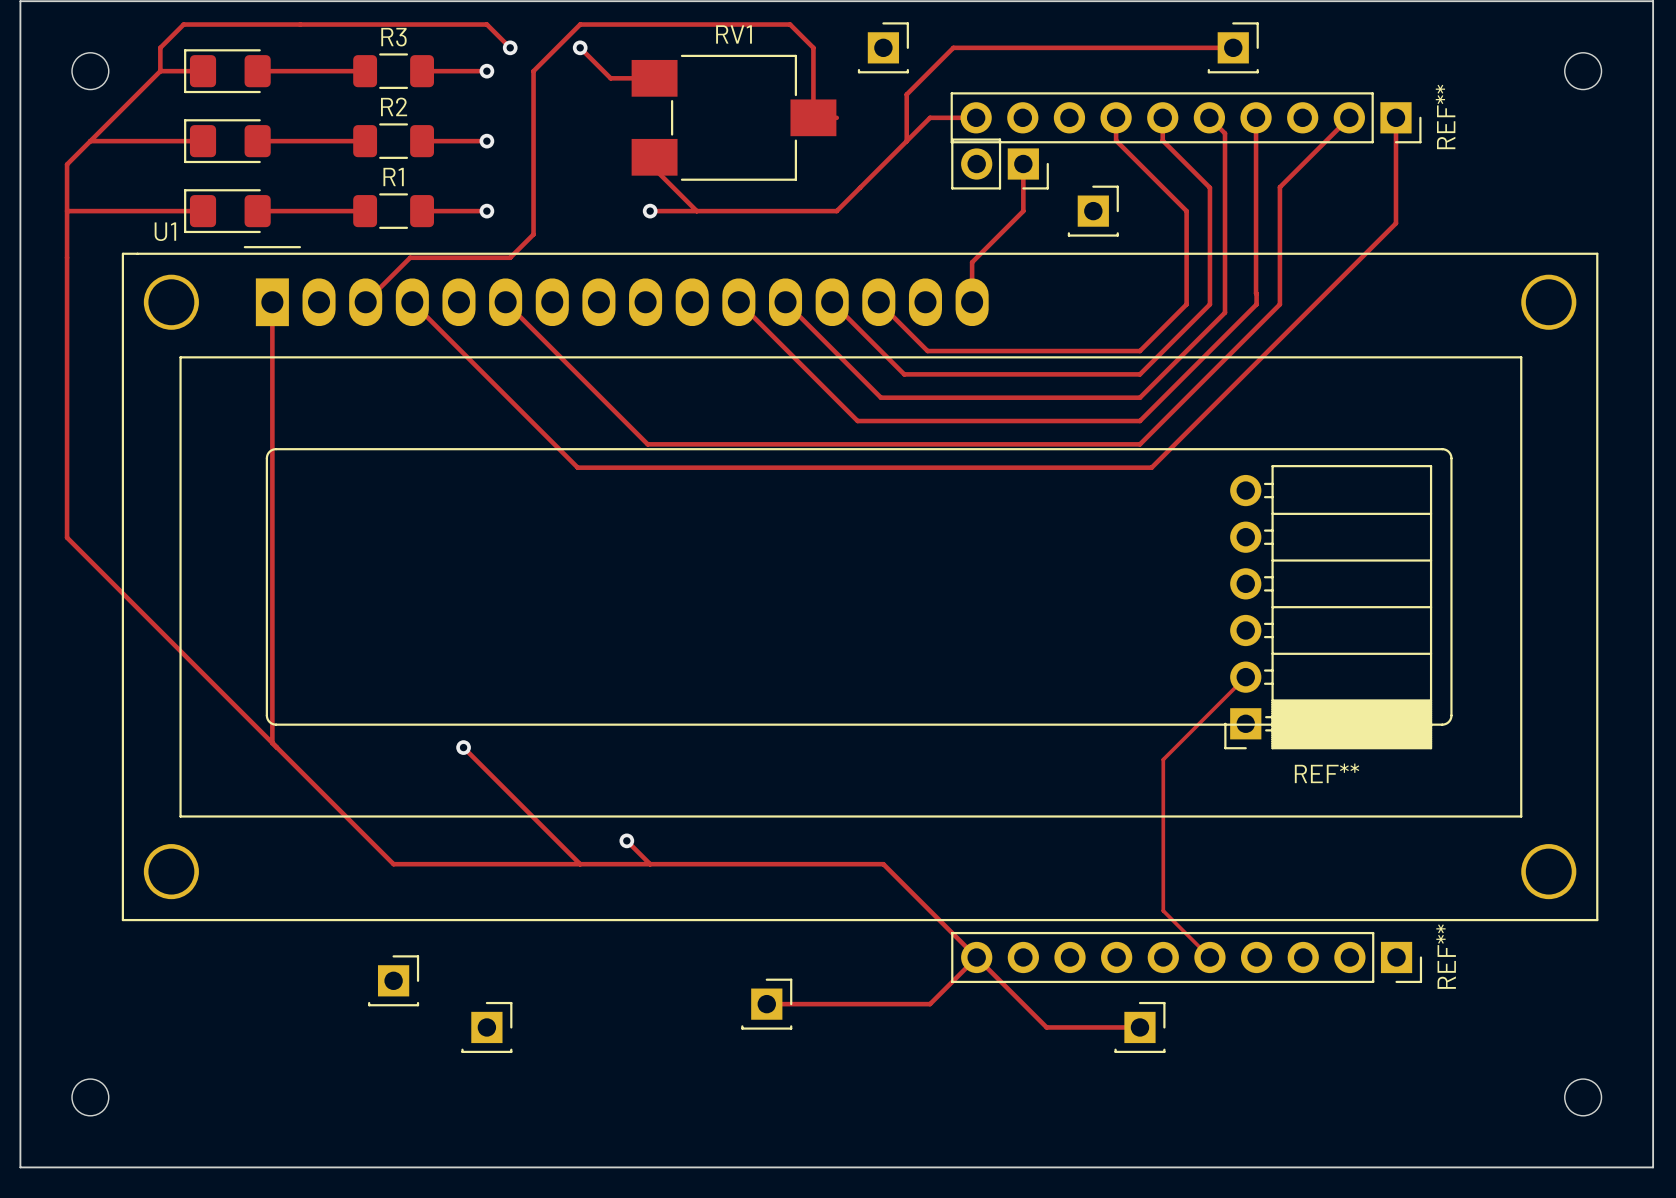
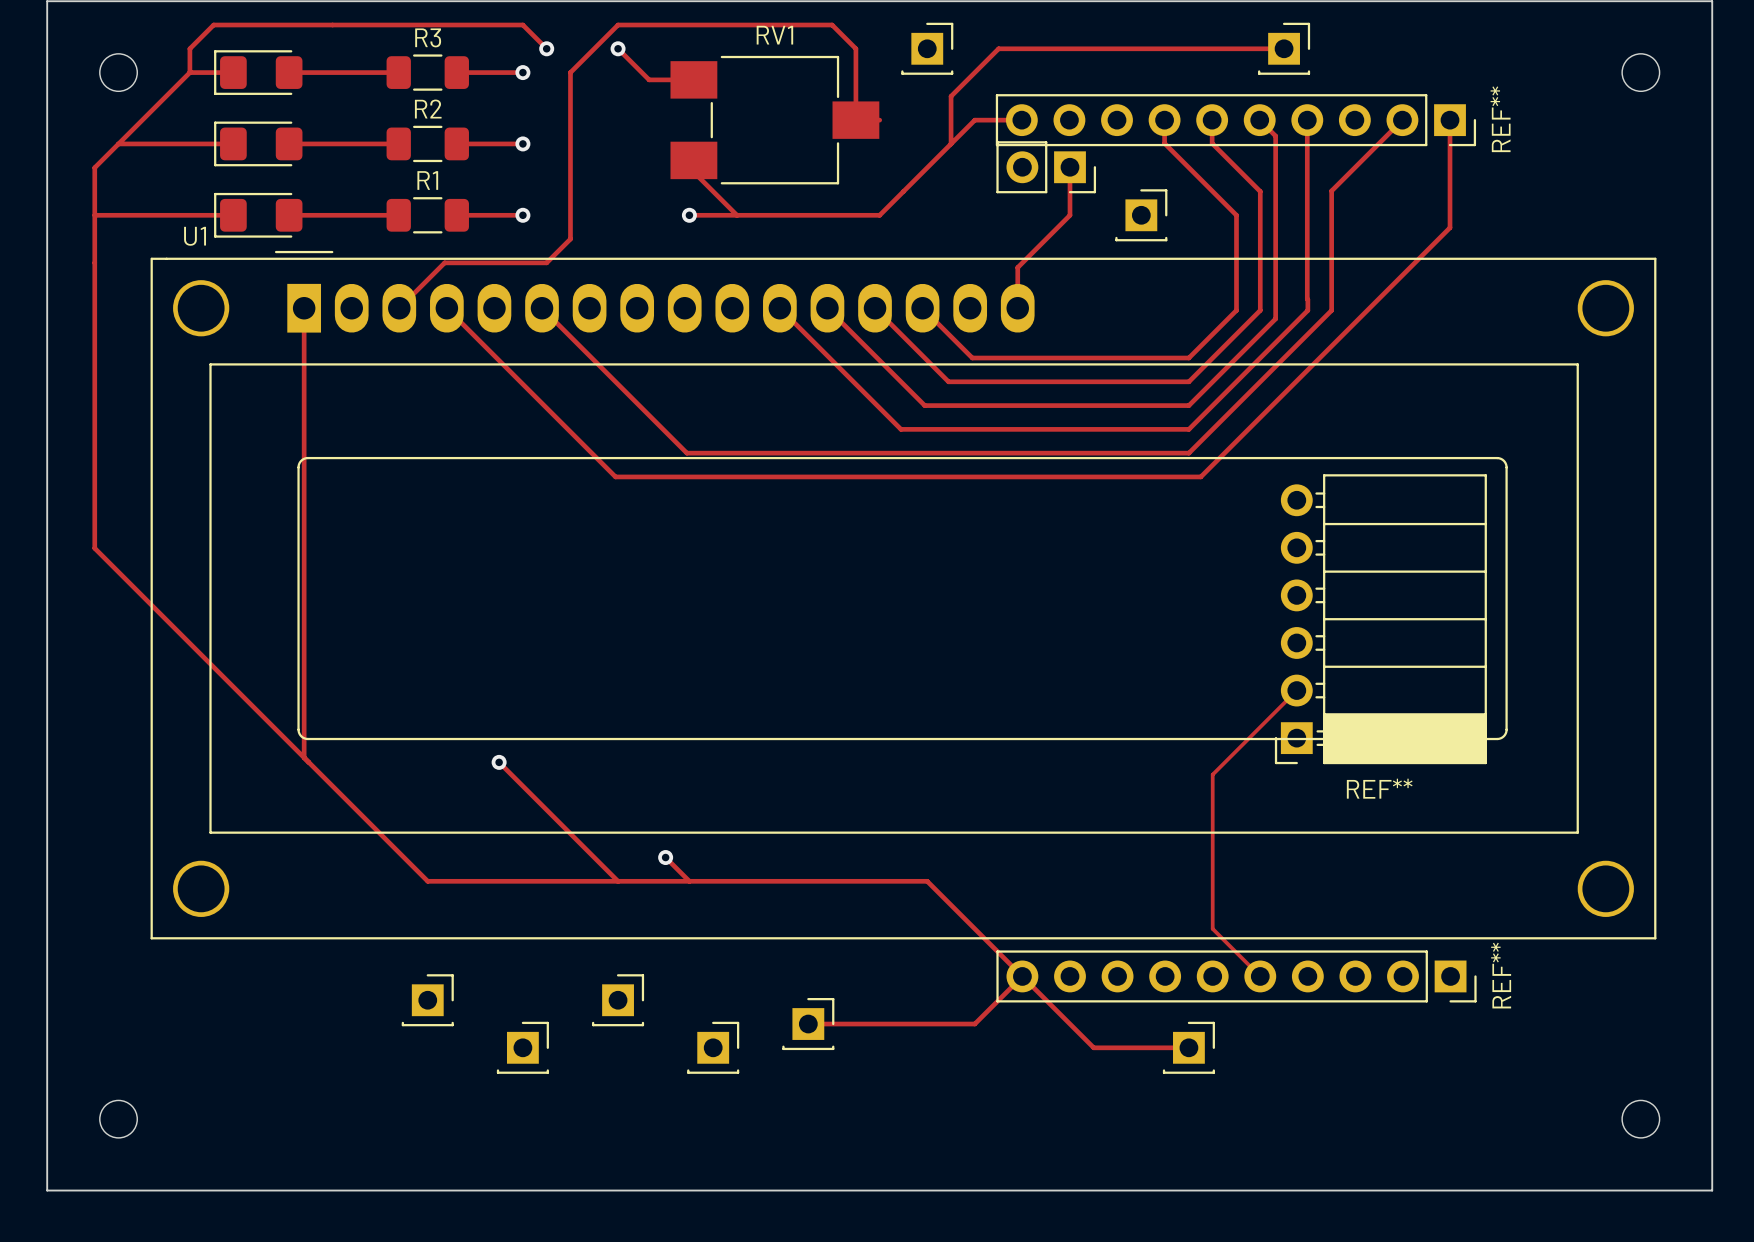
part: none -> (618, 1000)
part: none -> (713, 1047)

